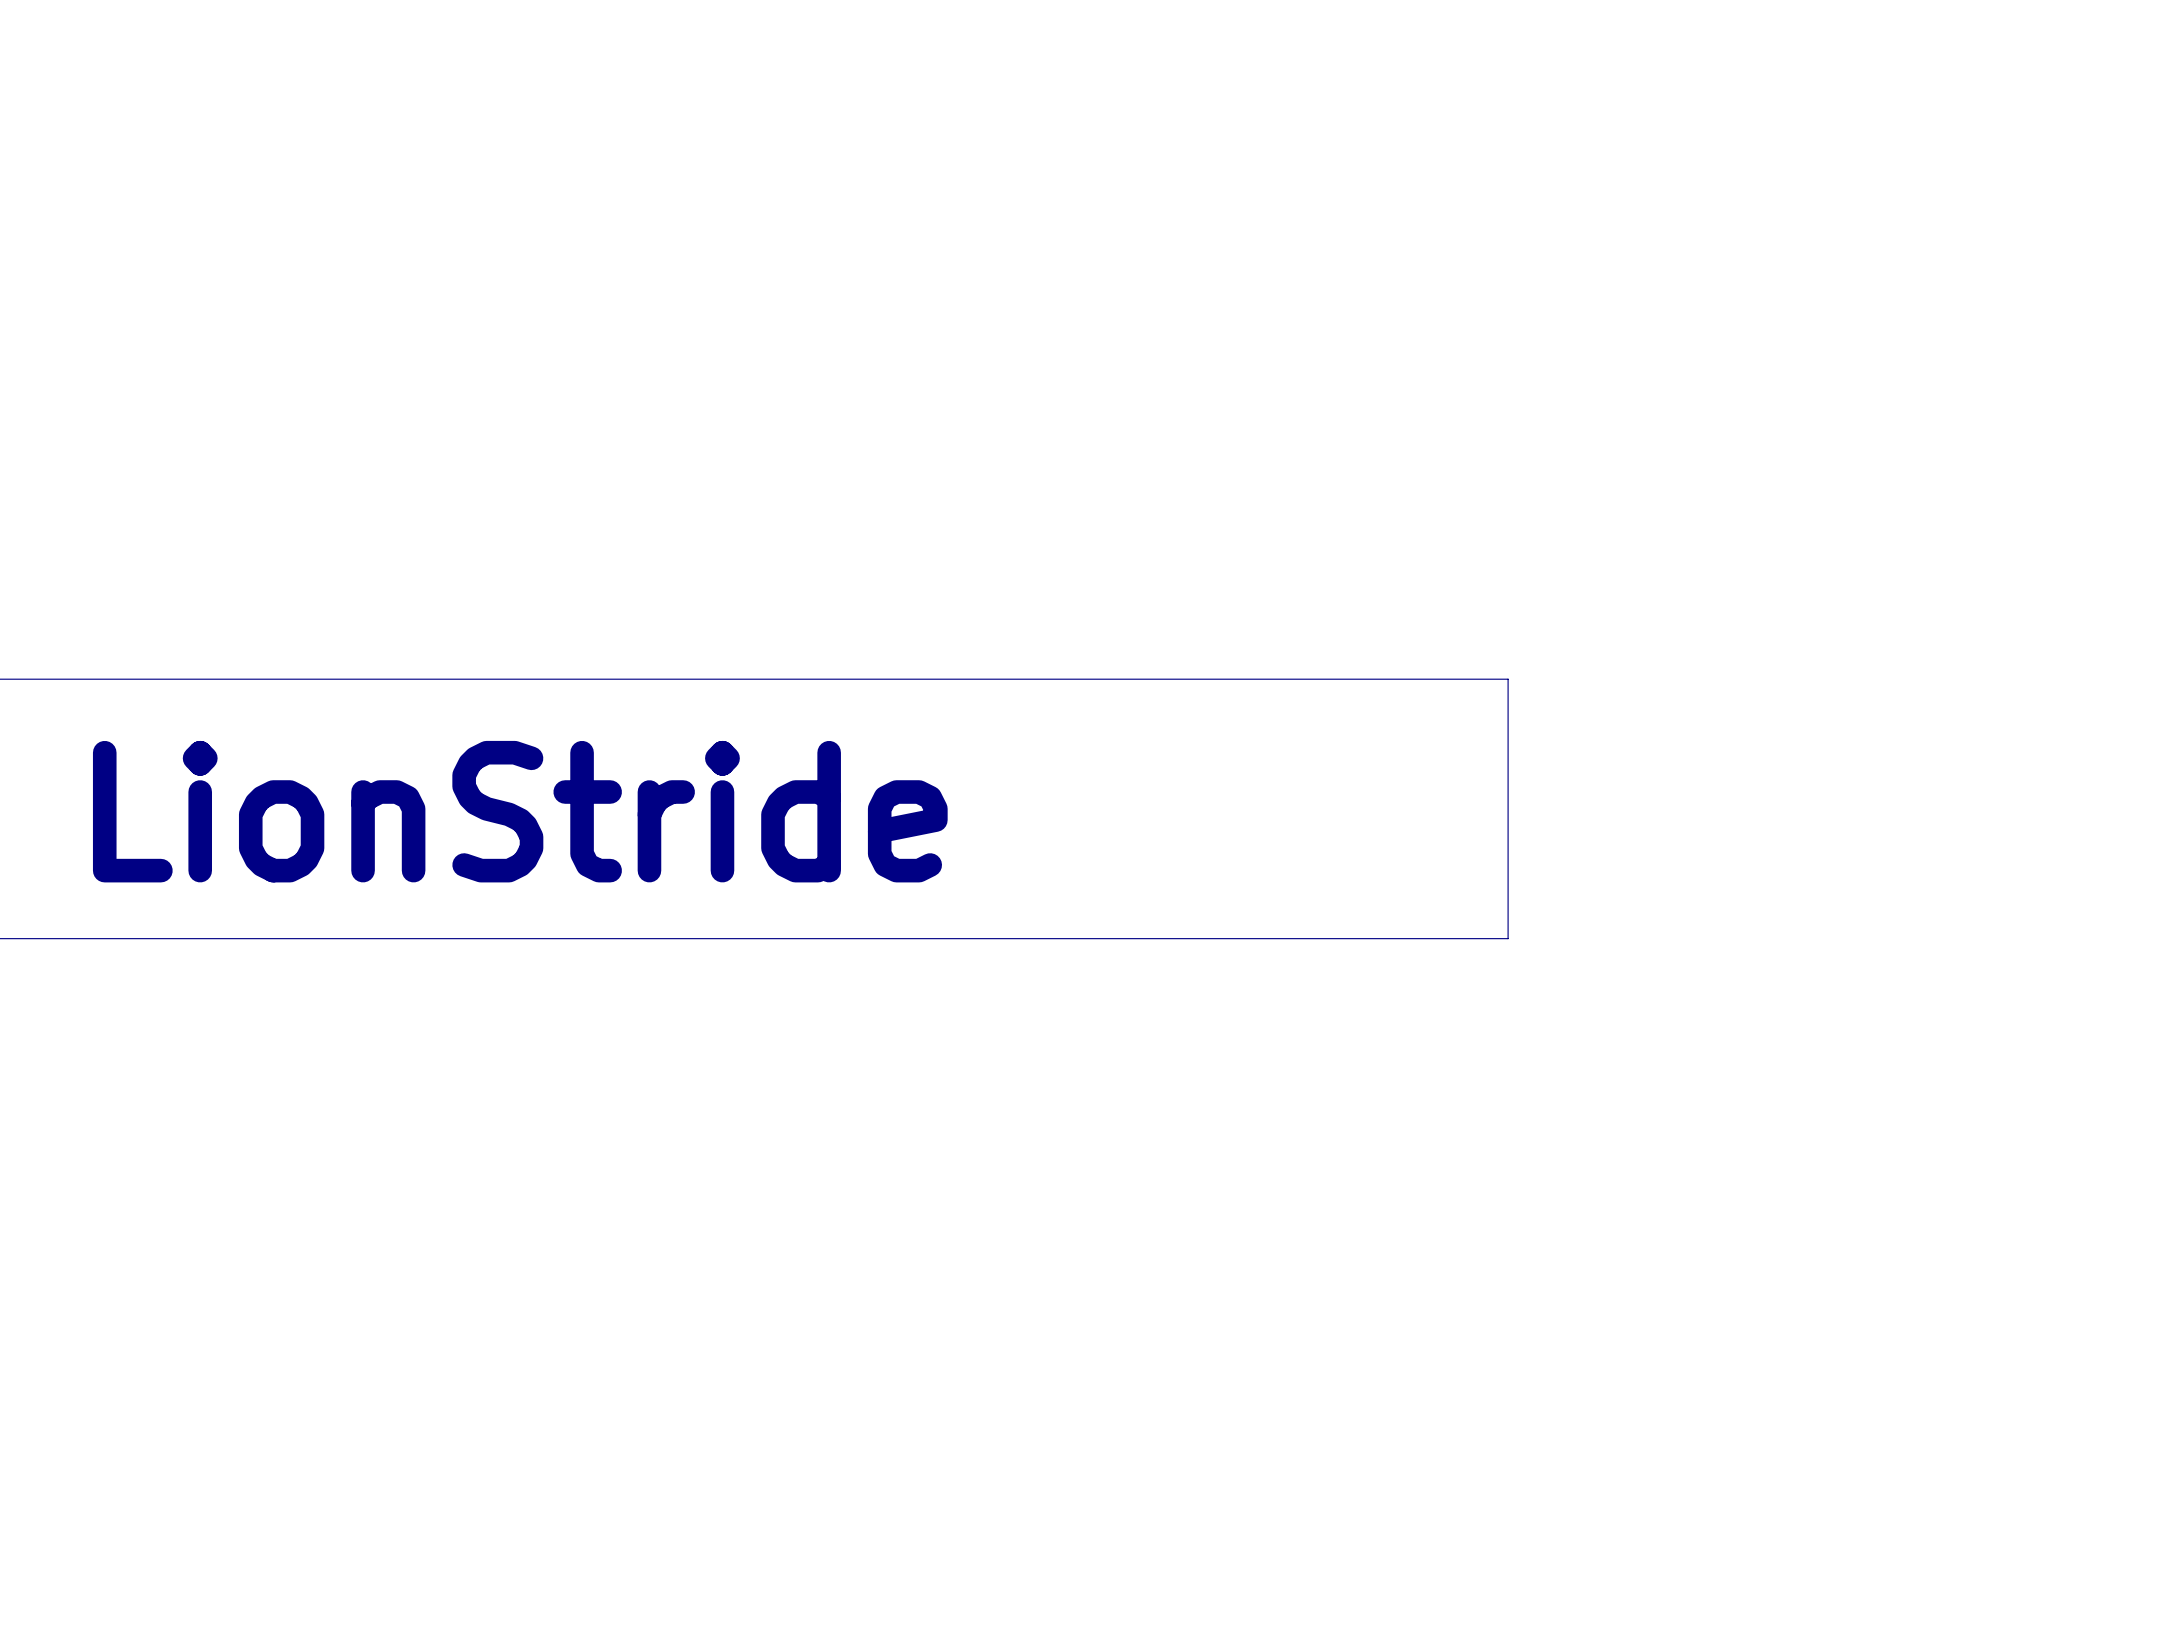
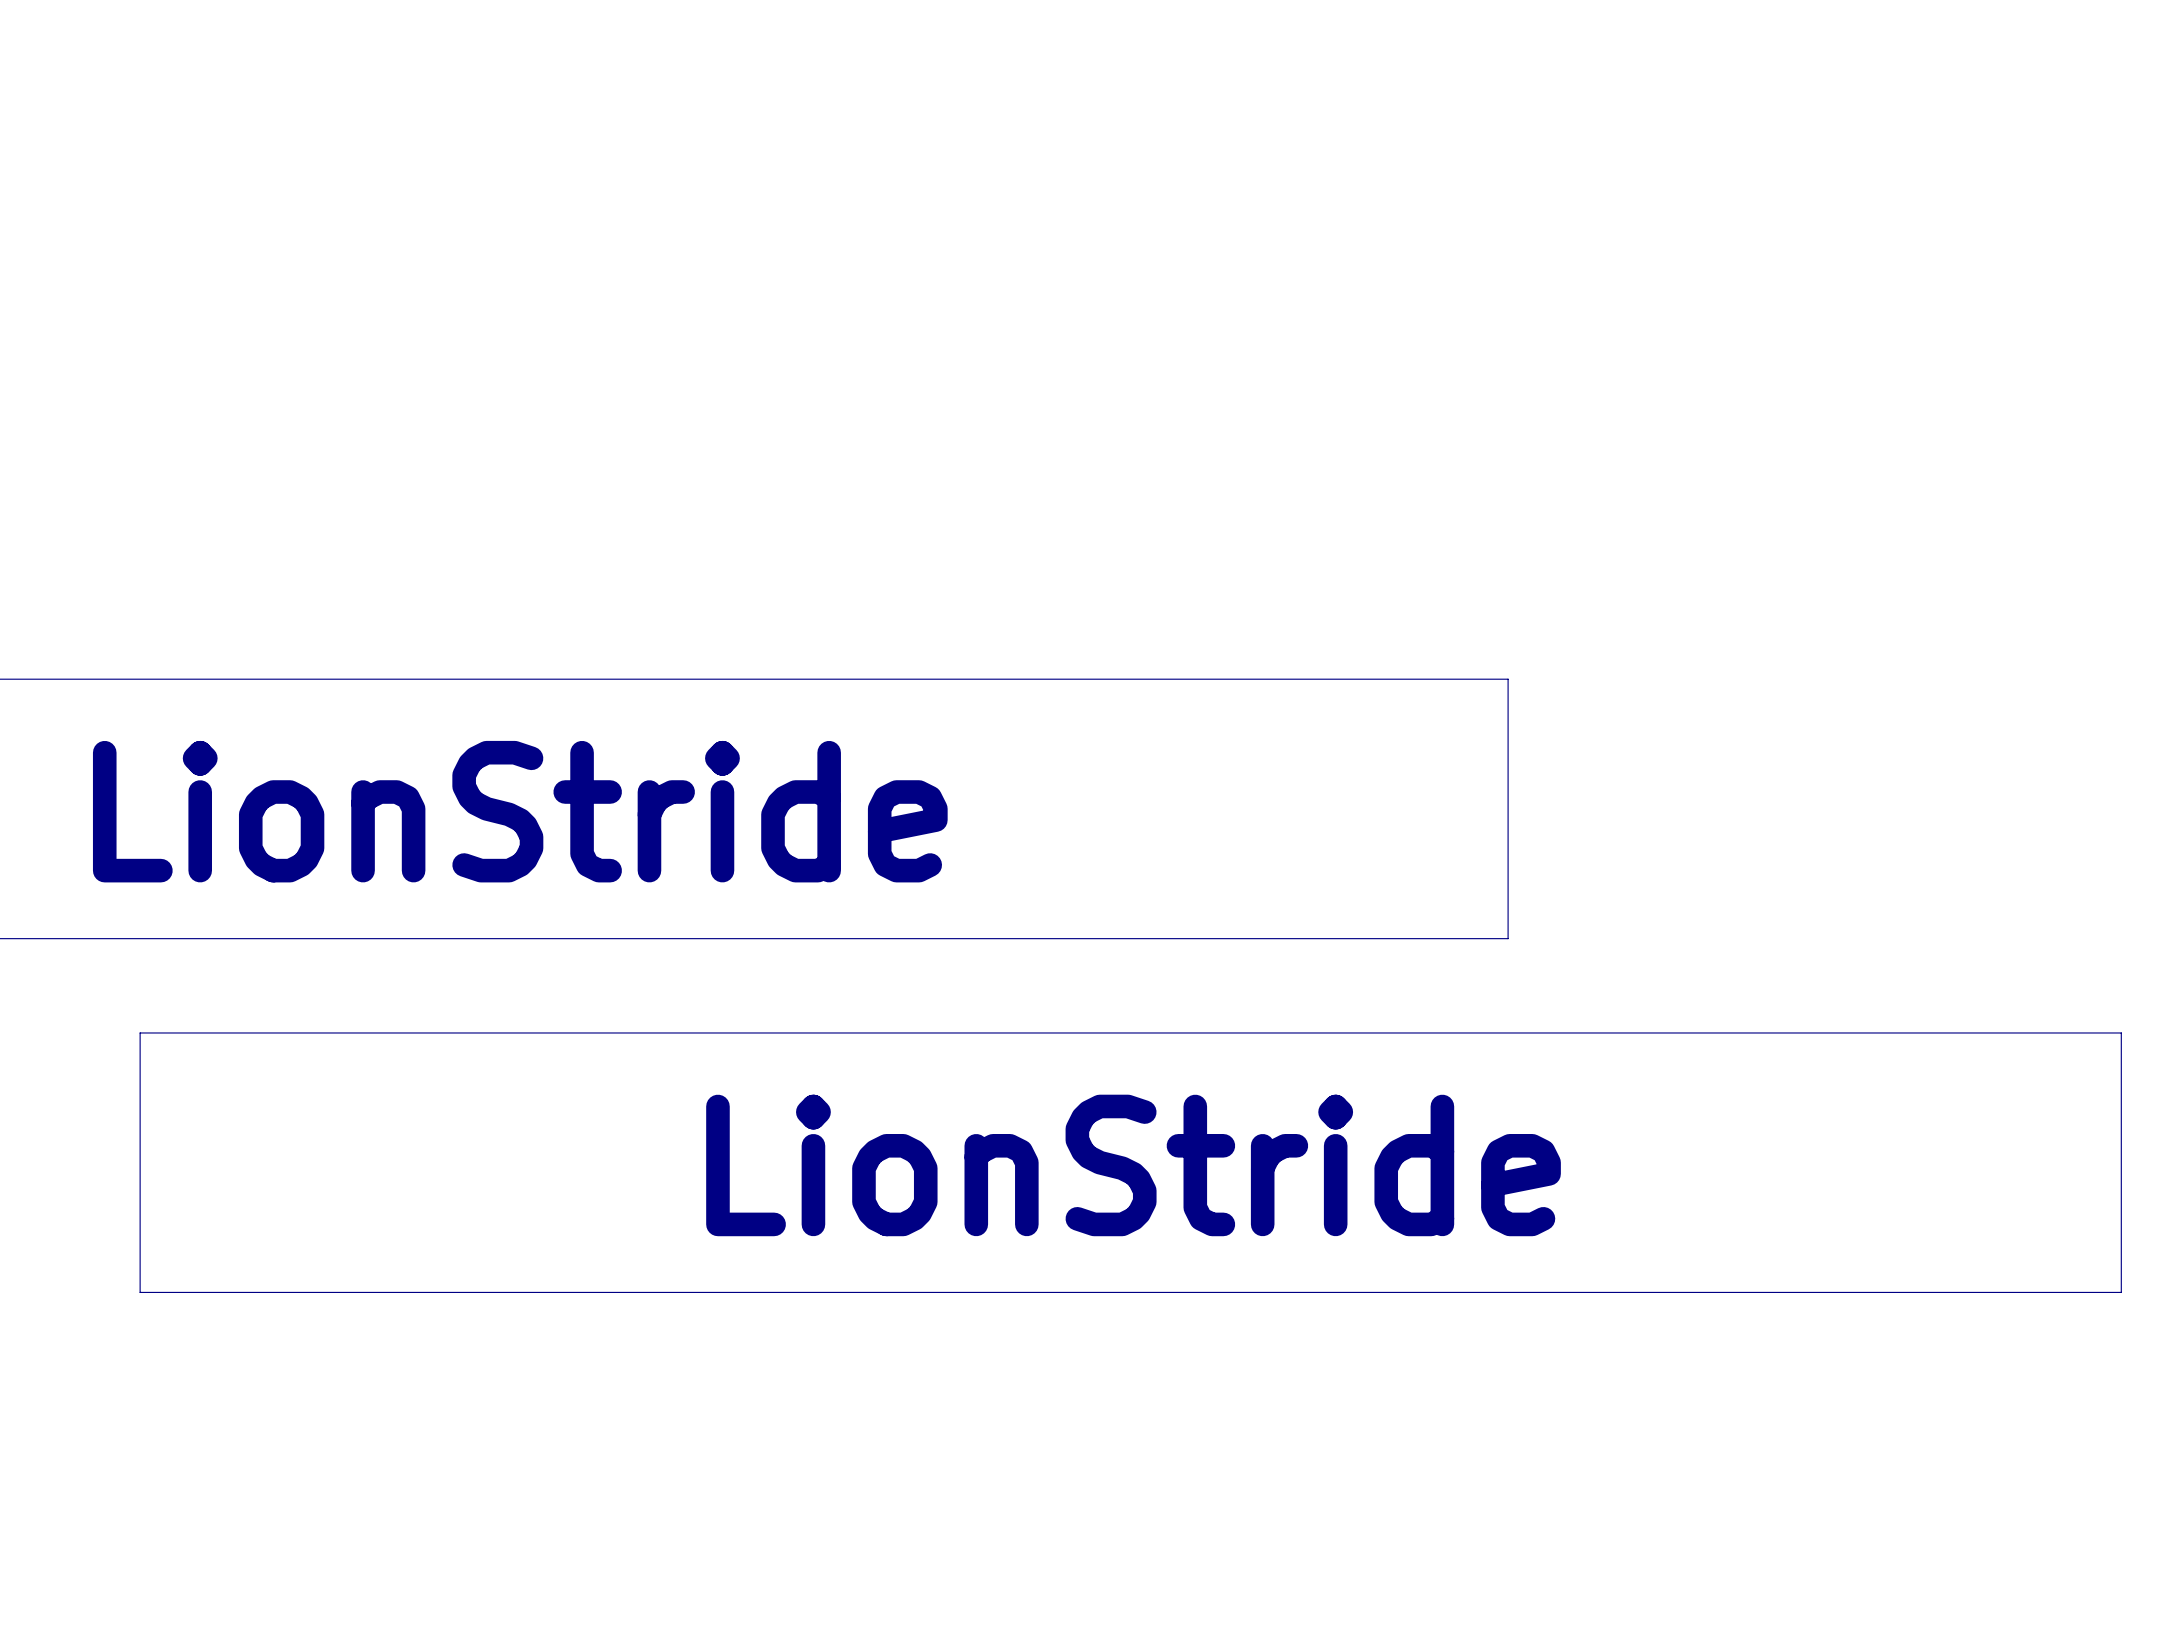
line: none -> (140, 1032) (2121, 1032) (2121, 1292) (140, 1292) (140, 1032)
text: none -> LionStride (1133, 1165)

